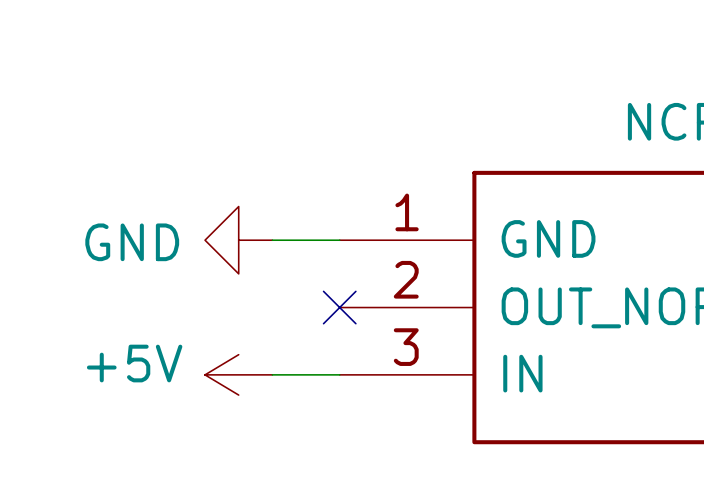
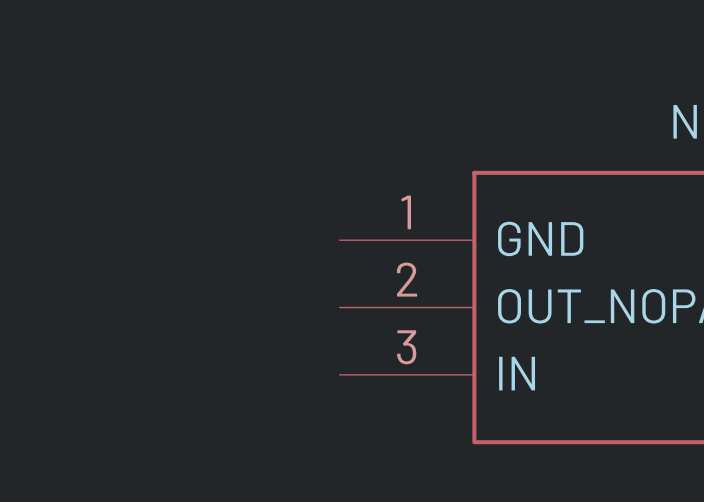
power symbol: GND (238, 240) -> none
wire: (272, 240) (339, 240) -> none
no-connect mark: (339, 307) -> none
power symbol: +5V (238, 374) -> none
wire: (272, 374) (339, 374) -> none

